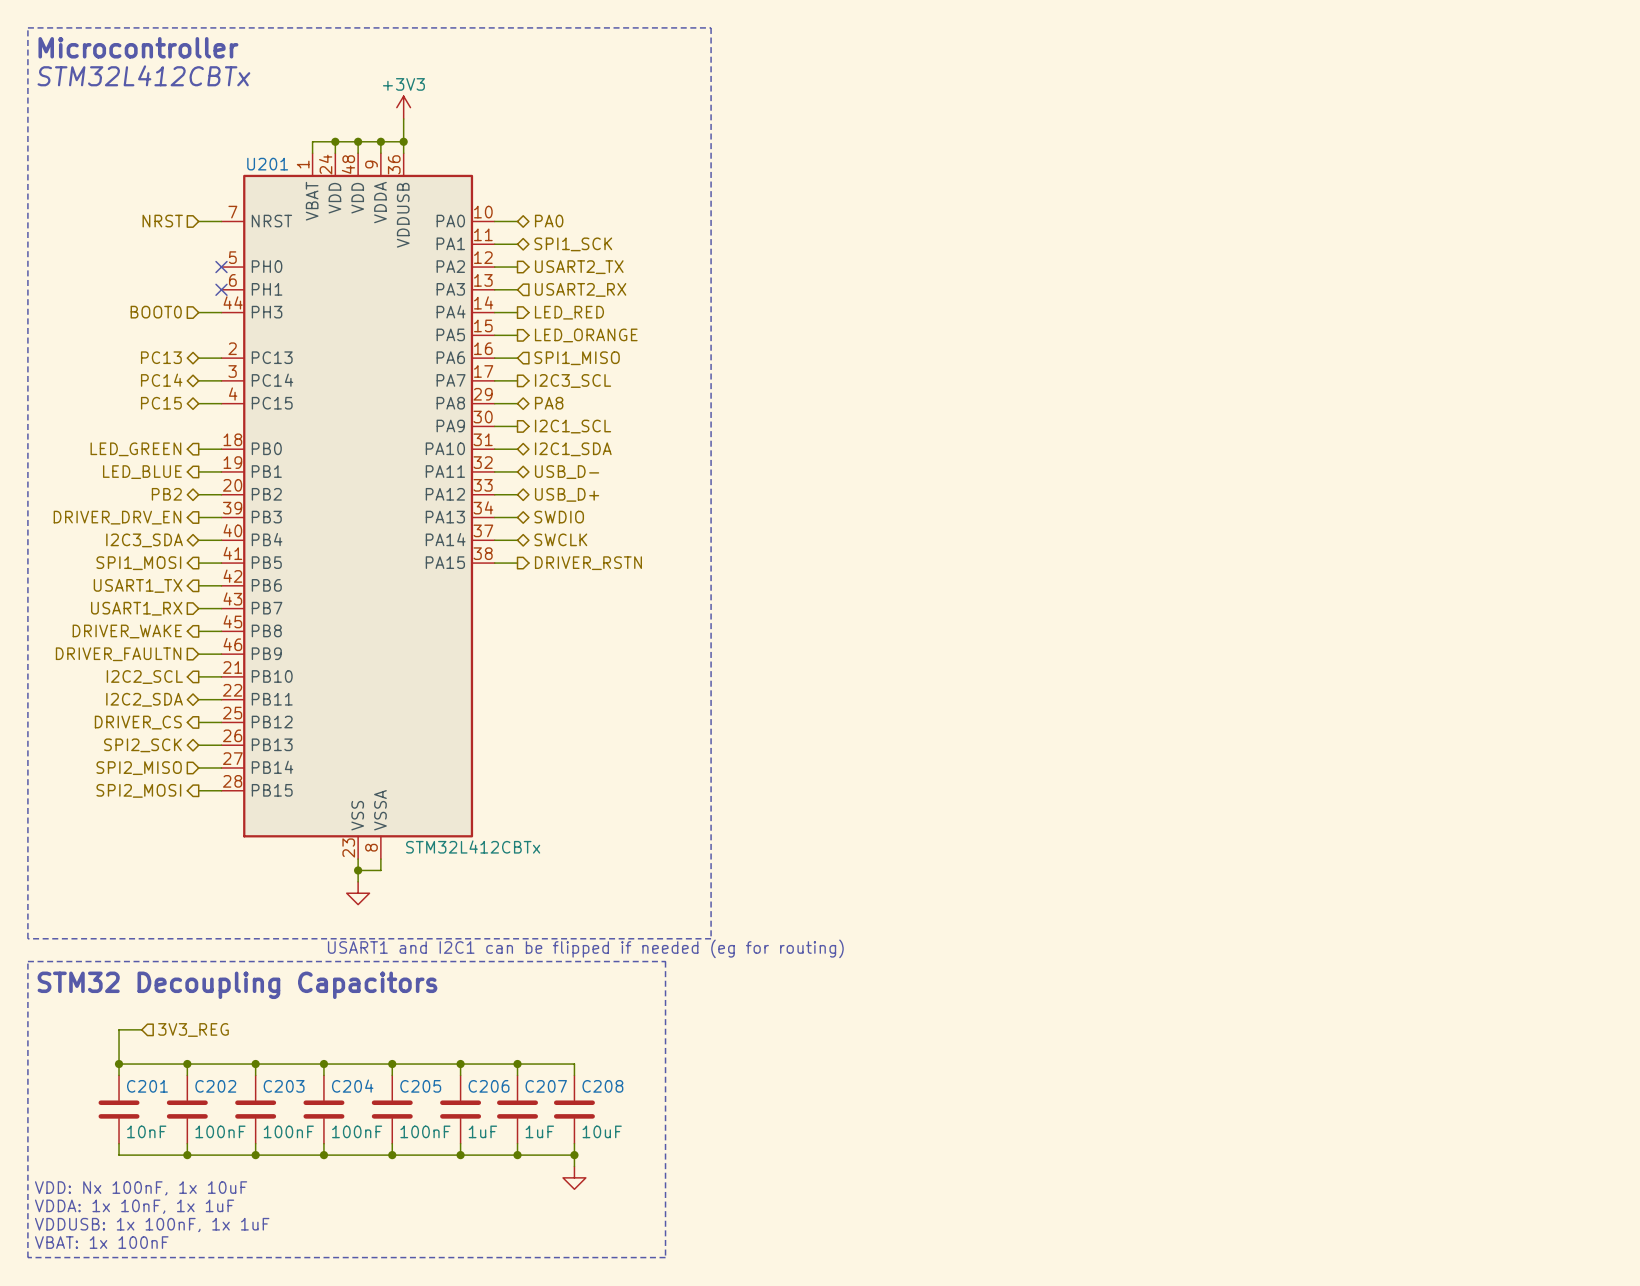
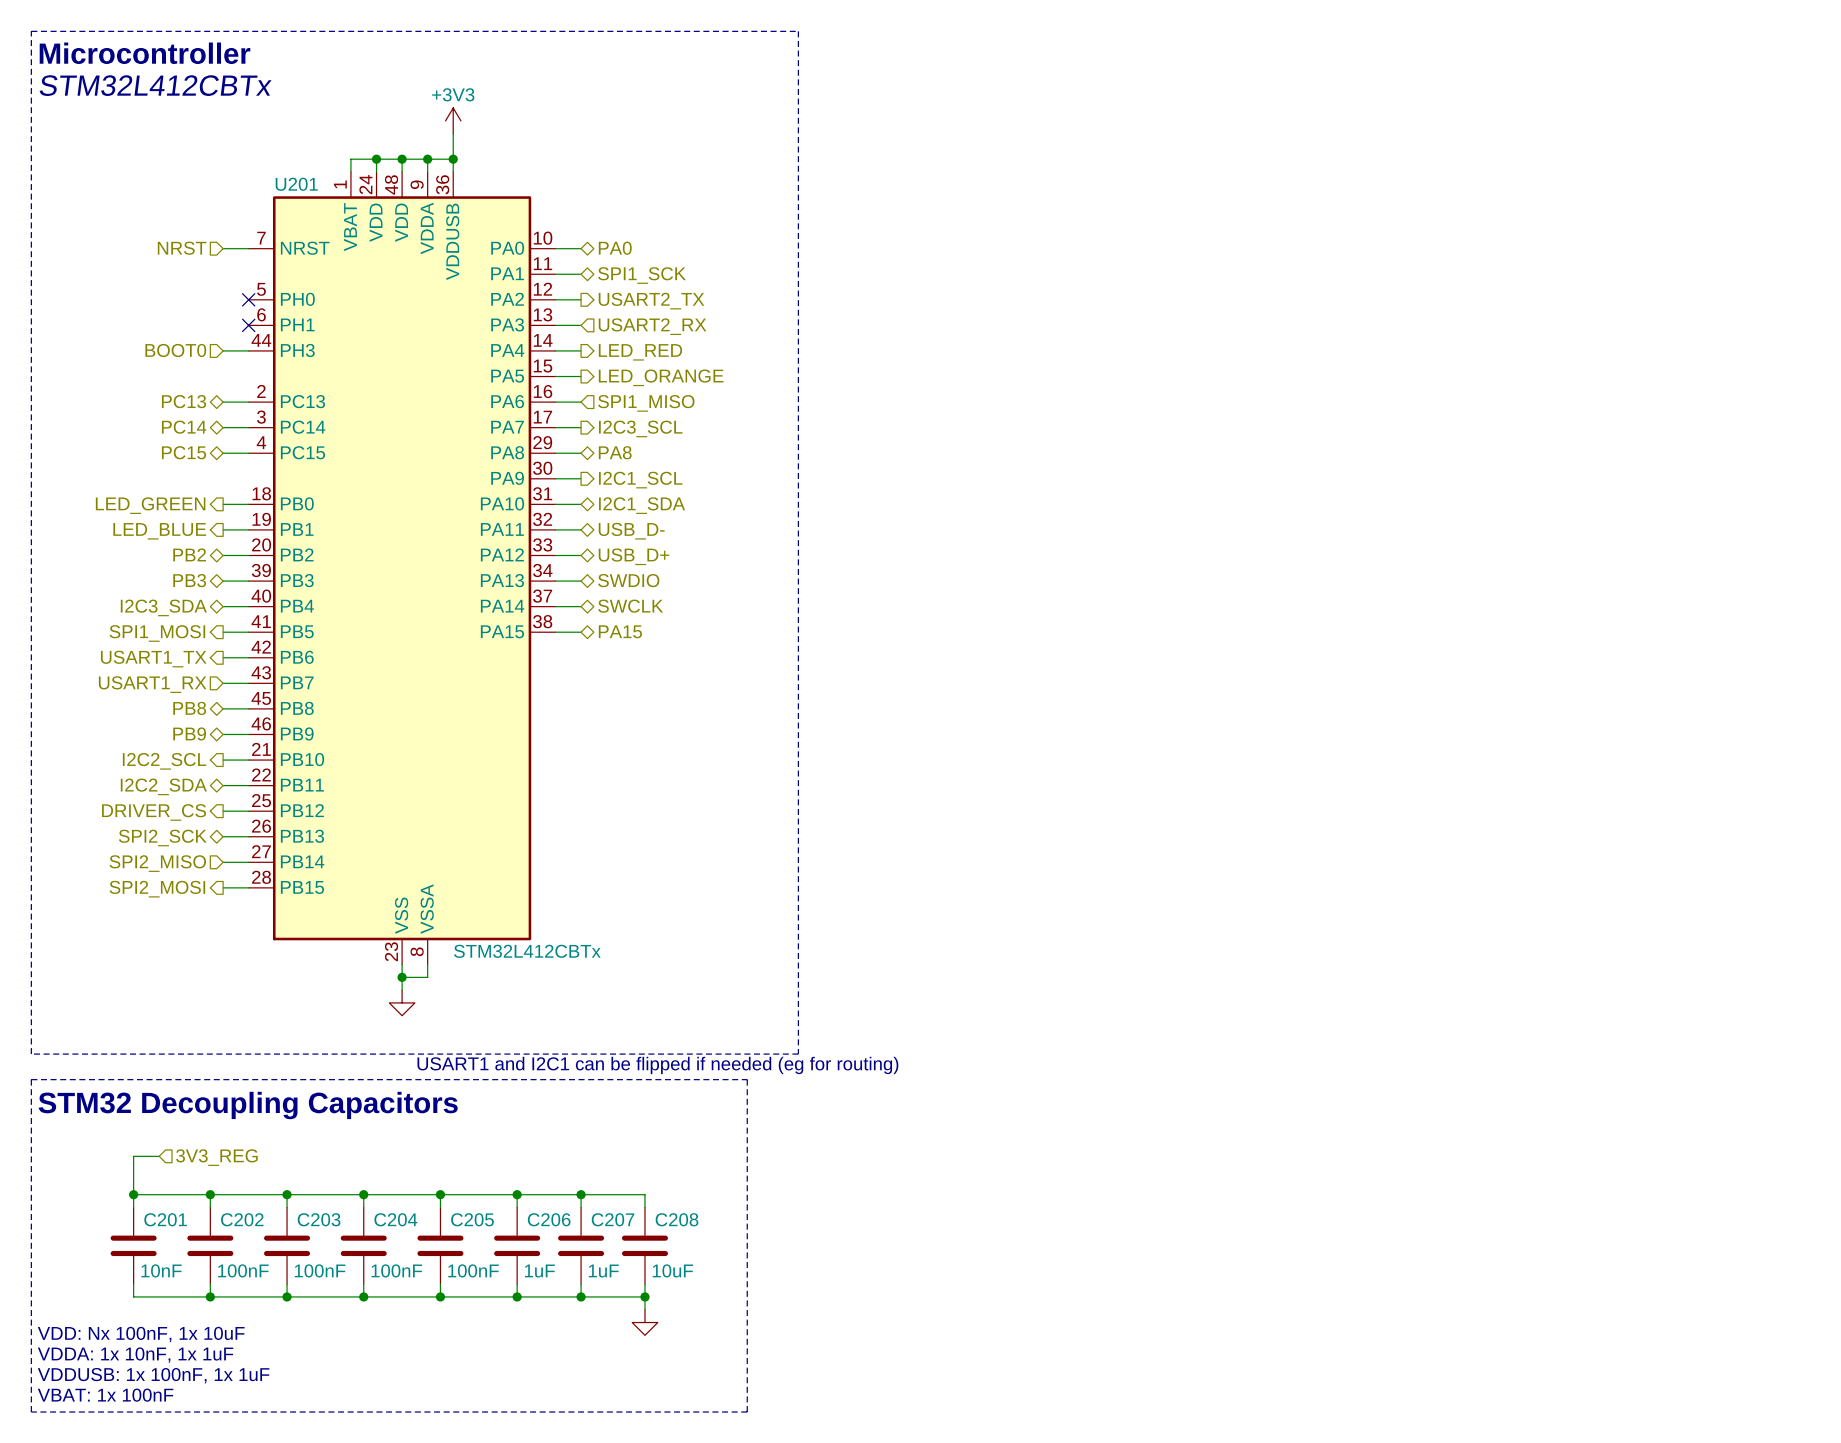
hierarchical label shape: output (117, 517) -> bidirectional (189, 580)
hierarchical label: DRIVER_DRV_EN (117, 517) -> PB3 (189, 580)
hierarchical label shape: output (588, 563) -> bidirectional (620, 631)
hierarchical label: DRIVER_RSTN (588, 563) -> PA15 (620, 631)
hierarchical label shape: output (127, 631) -> bidirectional (189, 708)
hierarchical label: DRIVER_WAKE (127, 631) -> PB8 (189, 708)
hierarchical label shape: input (118, 654) -> bidirectional (189, 733)
hierarchical label: DRIVER_FAULTN (118, 654) -> PB9 (189, 733)

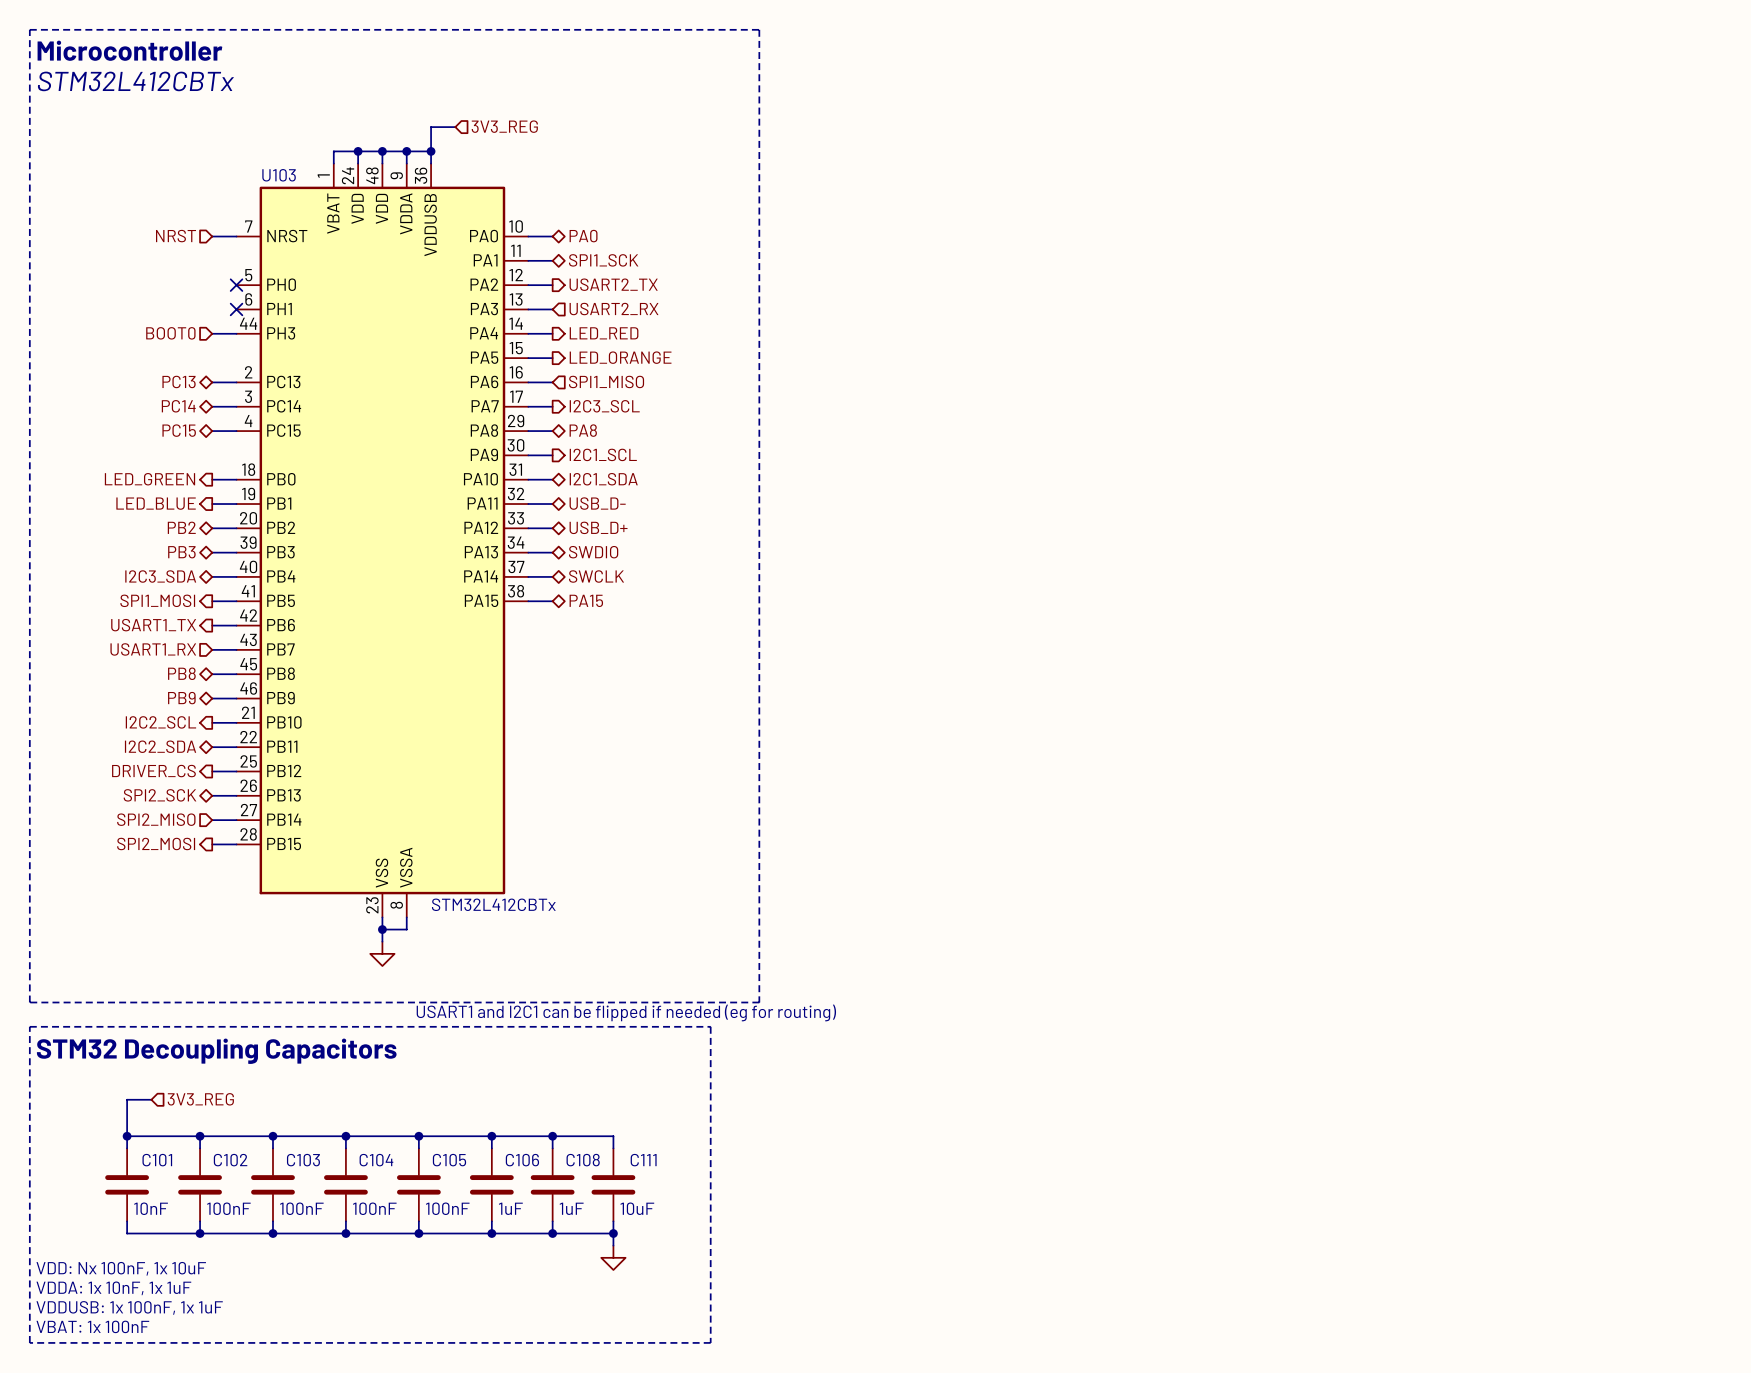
power symbol: +3V3 (453, 120) -> none
wire: none -> (431, 127) (455, 127)
hierarchical label: none -> 3V3_REG (504, 126)
U201 name: U201 (296, 184) -> U103 (279, 175)
C201 name: C201 (165, 1219) -> C101 (157, 1160)
C202 name: C202 (242, 1219) -> C102 (230, 1160)
C203 name: C203 (319, 1219) -> C103 (303, 1160)
C204 name: C204 (395, 1219) -> C104 (376, 1160)
C205 name: C205 (472, 1219) -> C105 (449, 1160)
C206 name: C206 (549, 1219) -> C106 (522, 1160)
C207 name: C207 (613, 1219) -> C108 (583, 1160)
C208 name: C208 (677, 1219) -> C111 (643, 1160)

